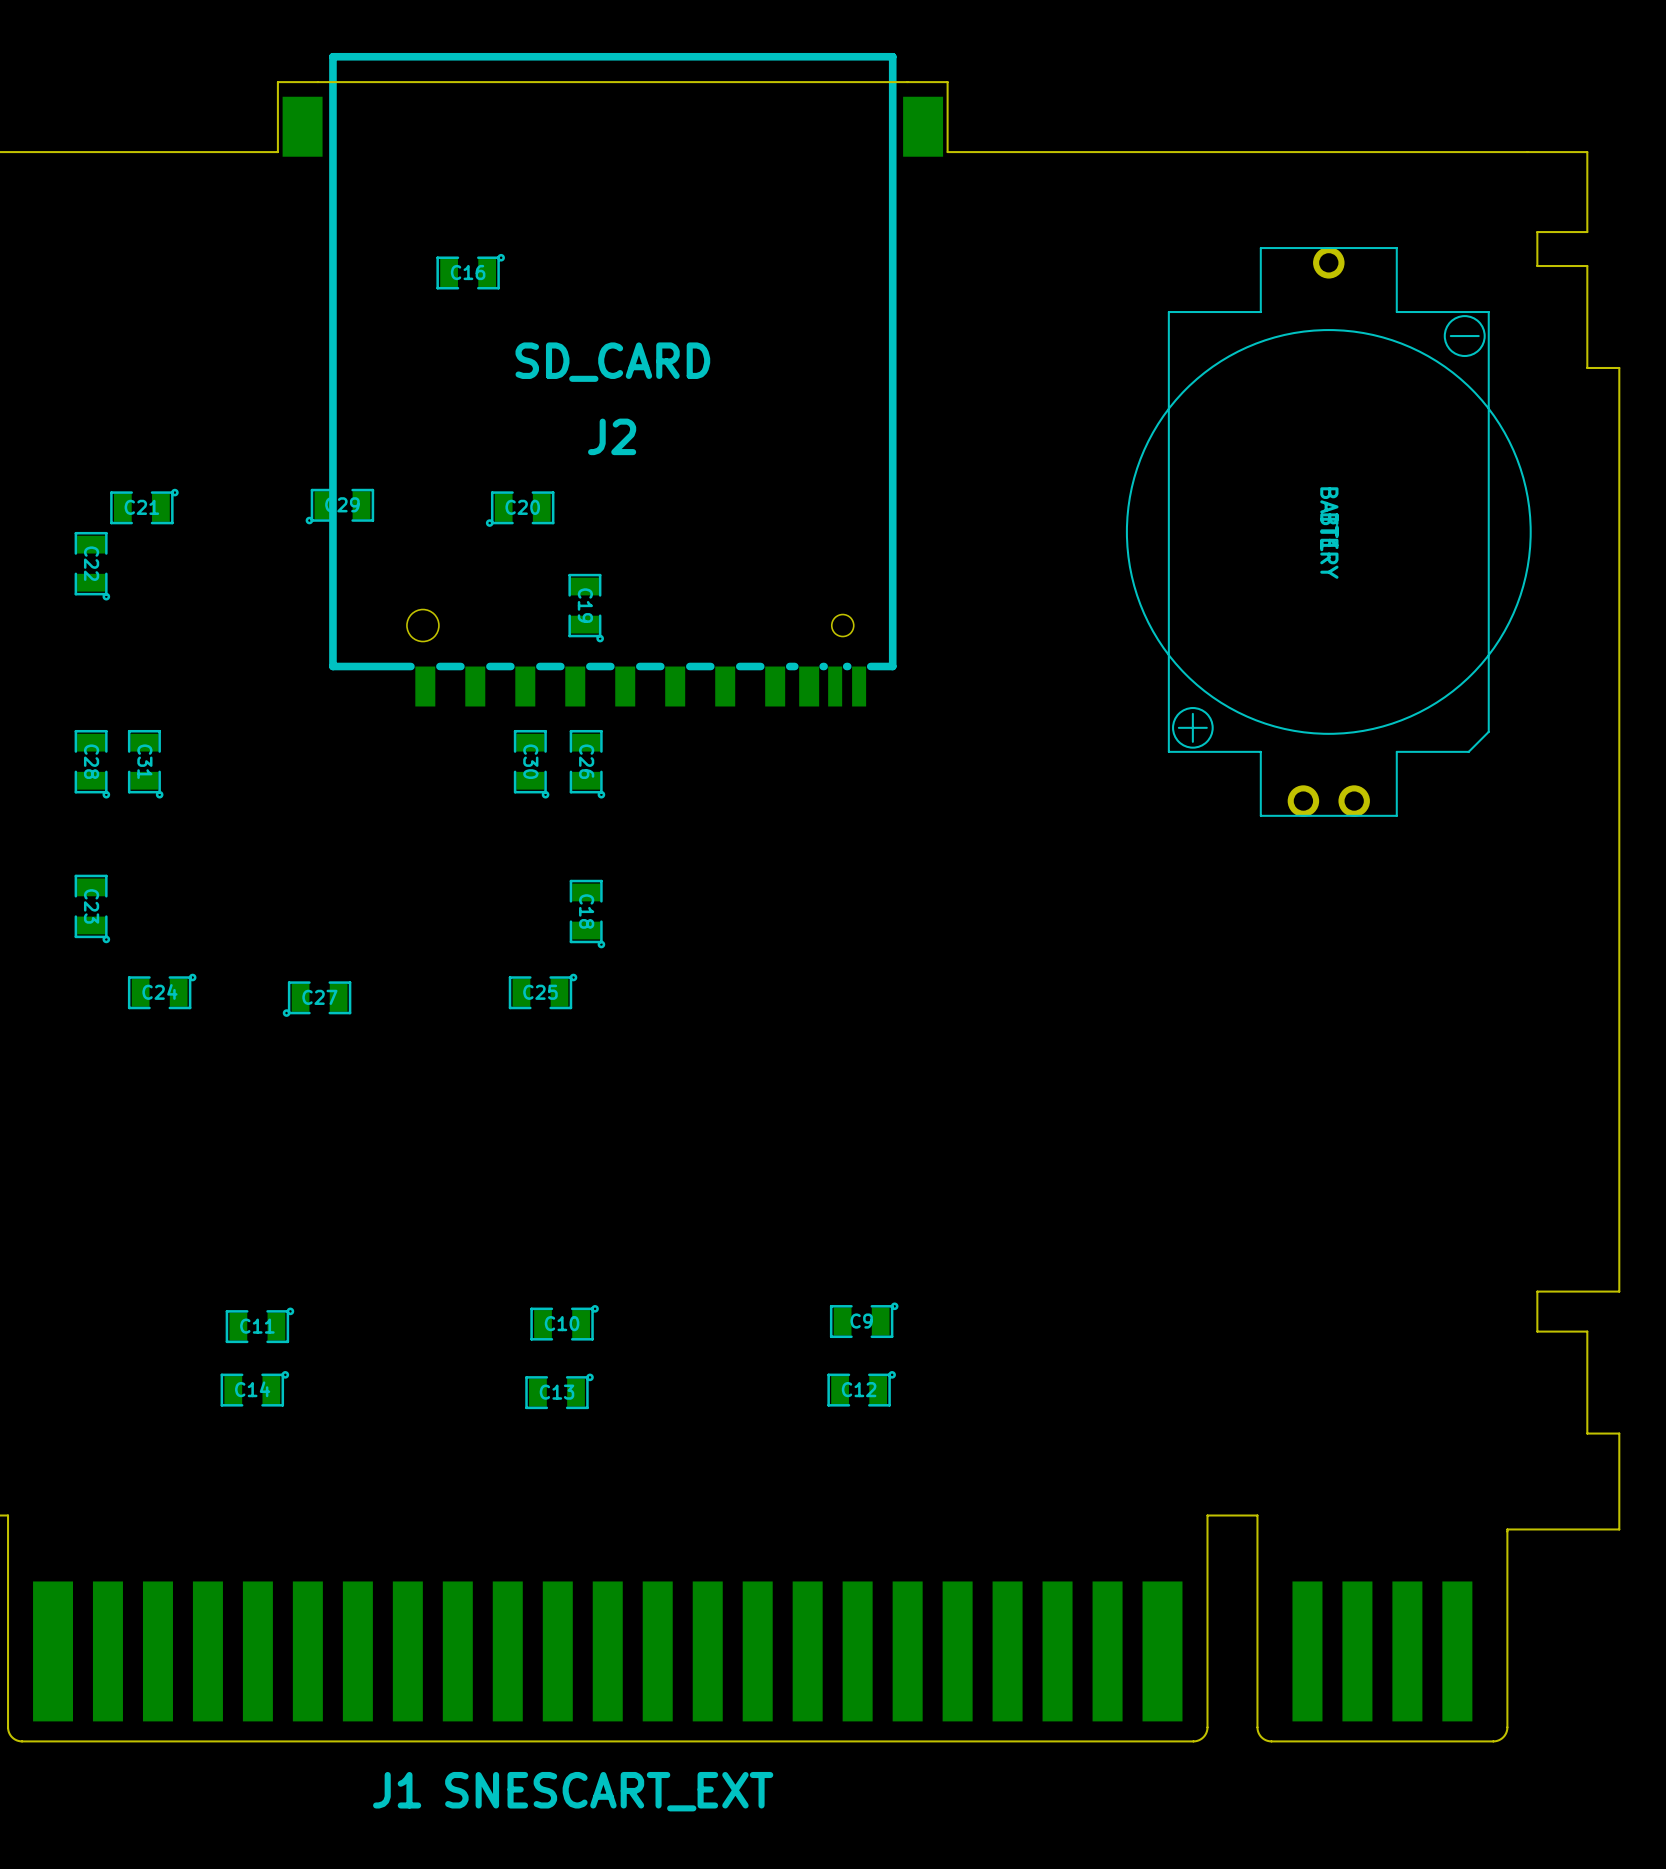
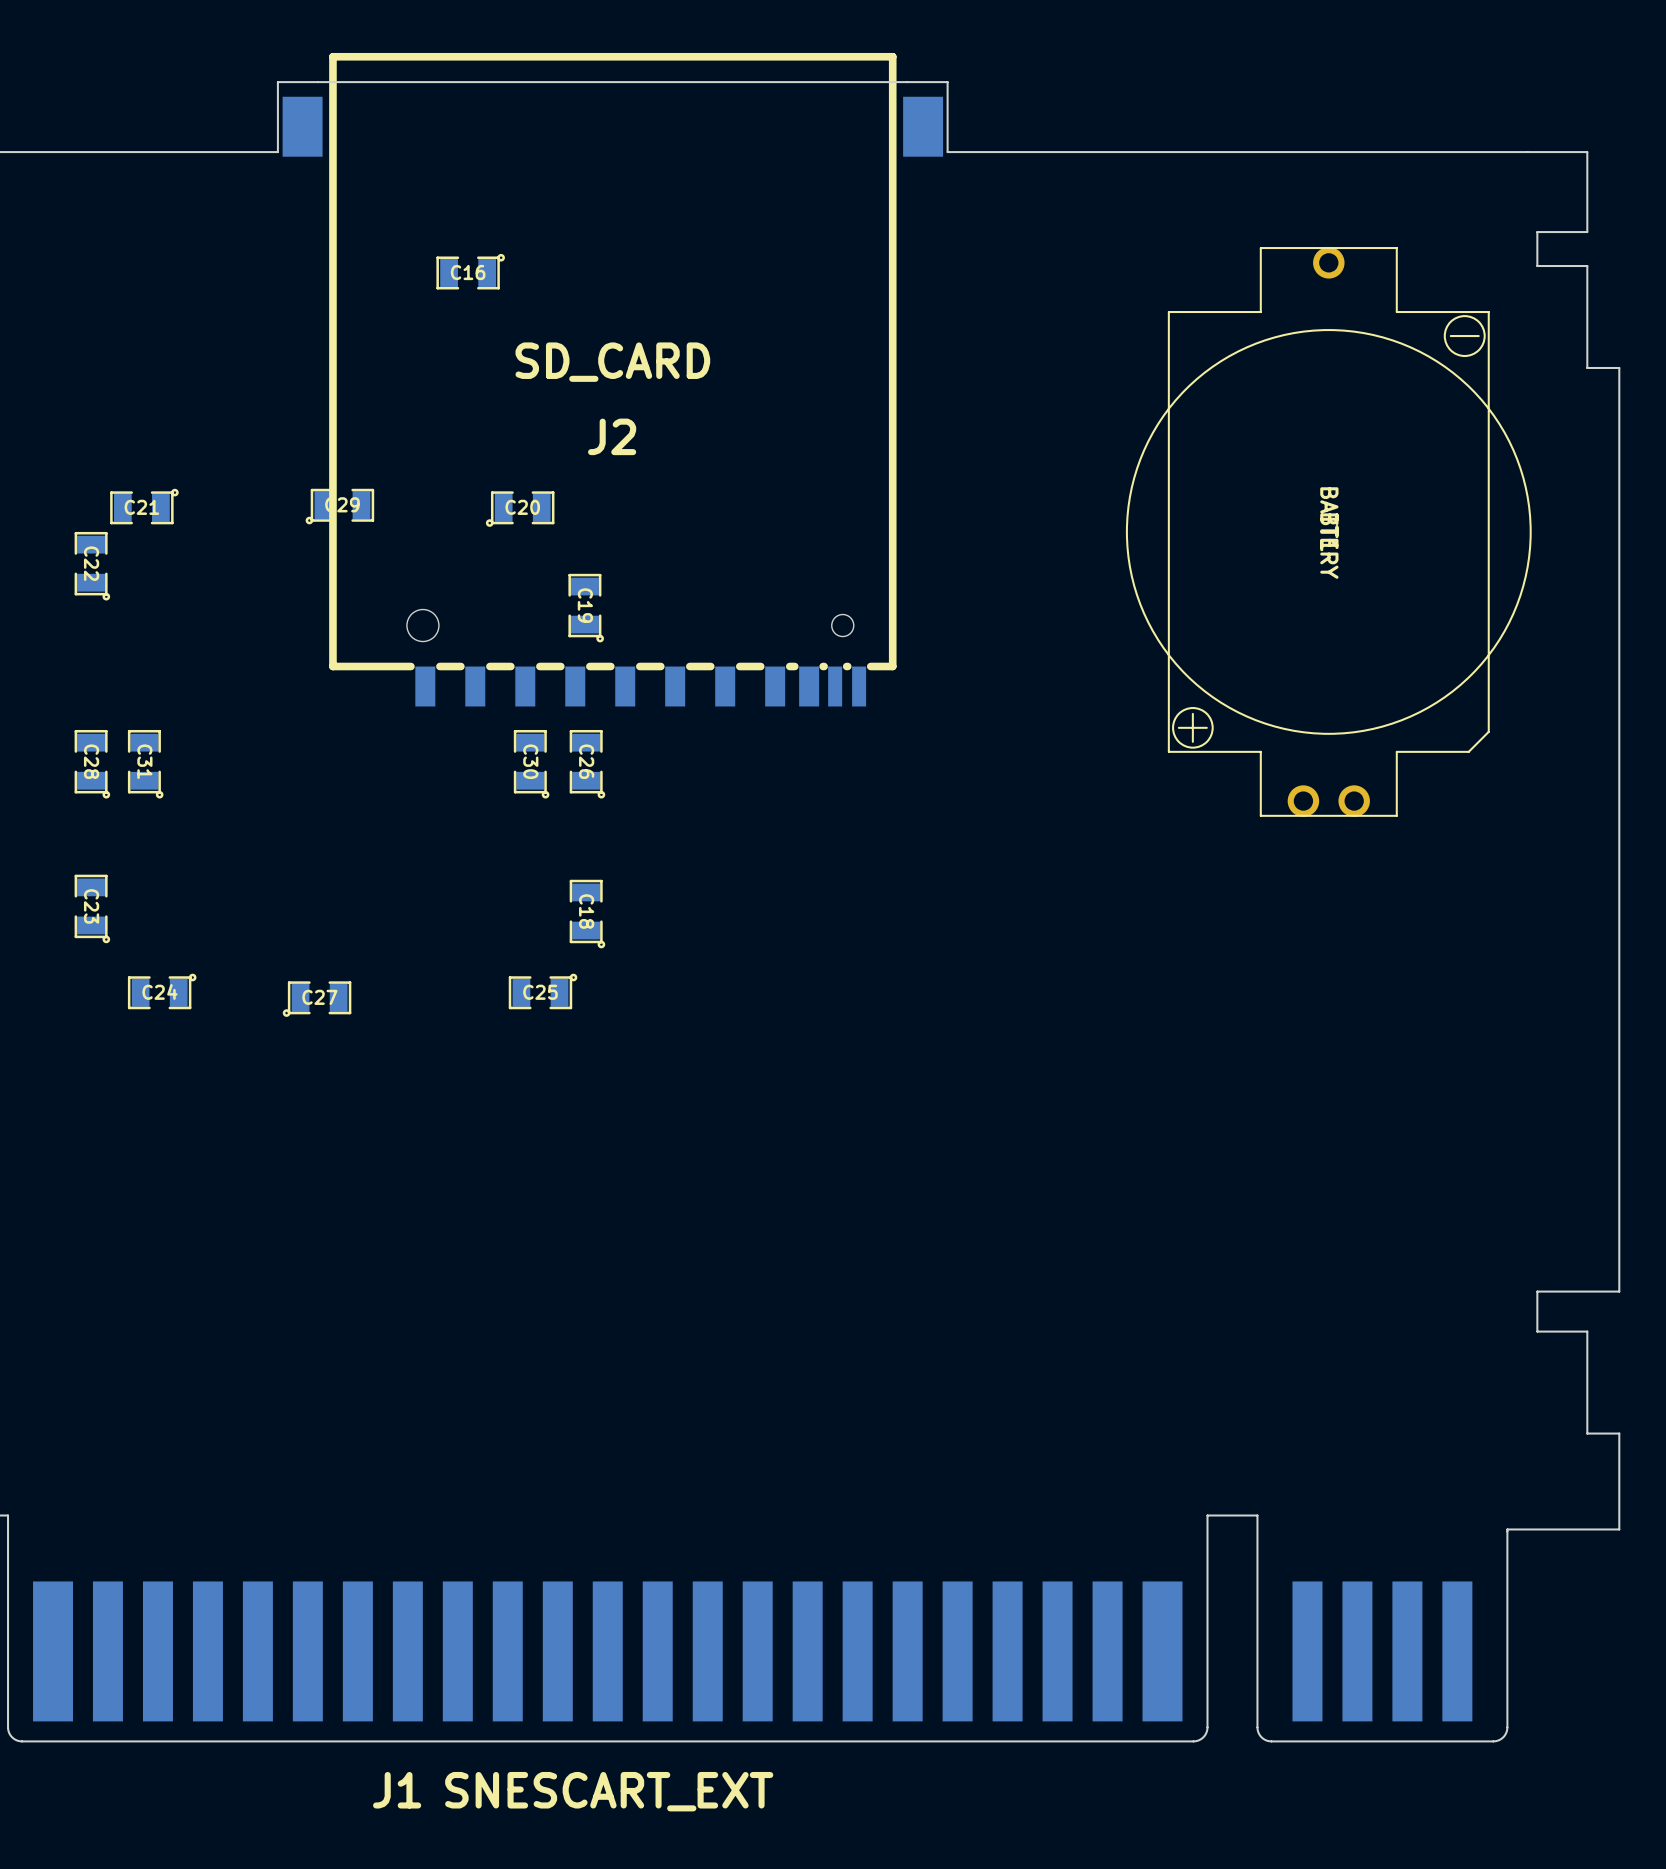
C9: (864, 1320) -> none
C10: (564, 1322) -> none
C11: (259, 1325) -> none
C14: (254, 1388) -> none
C12: (861, 1388) -> none
C13: (559, 1391) -> none

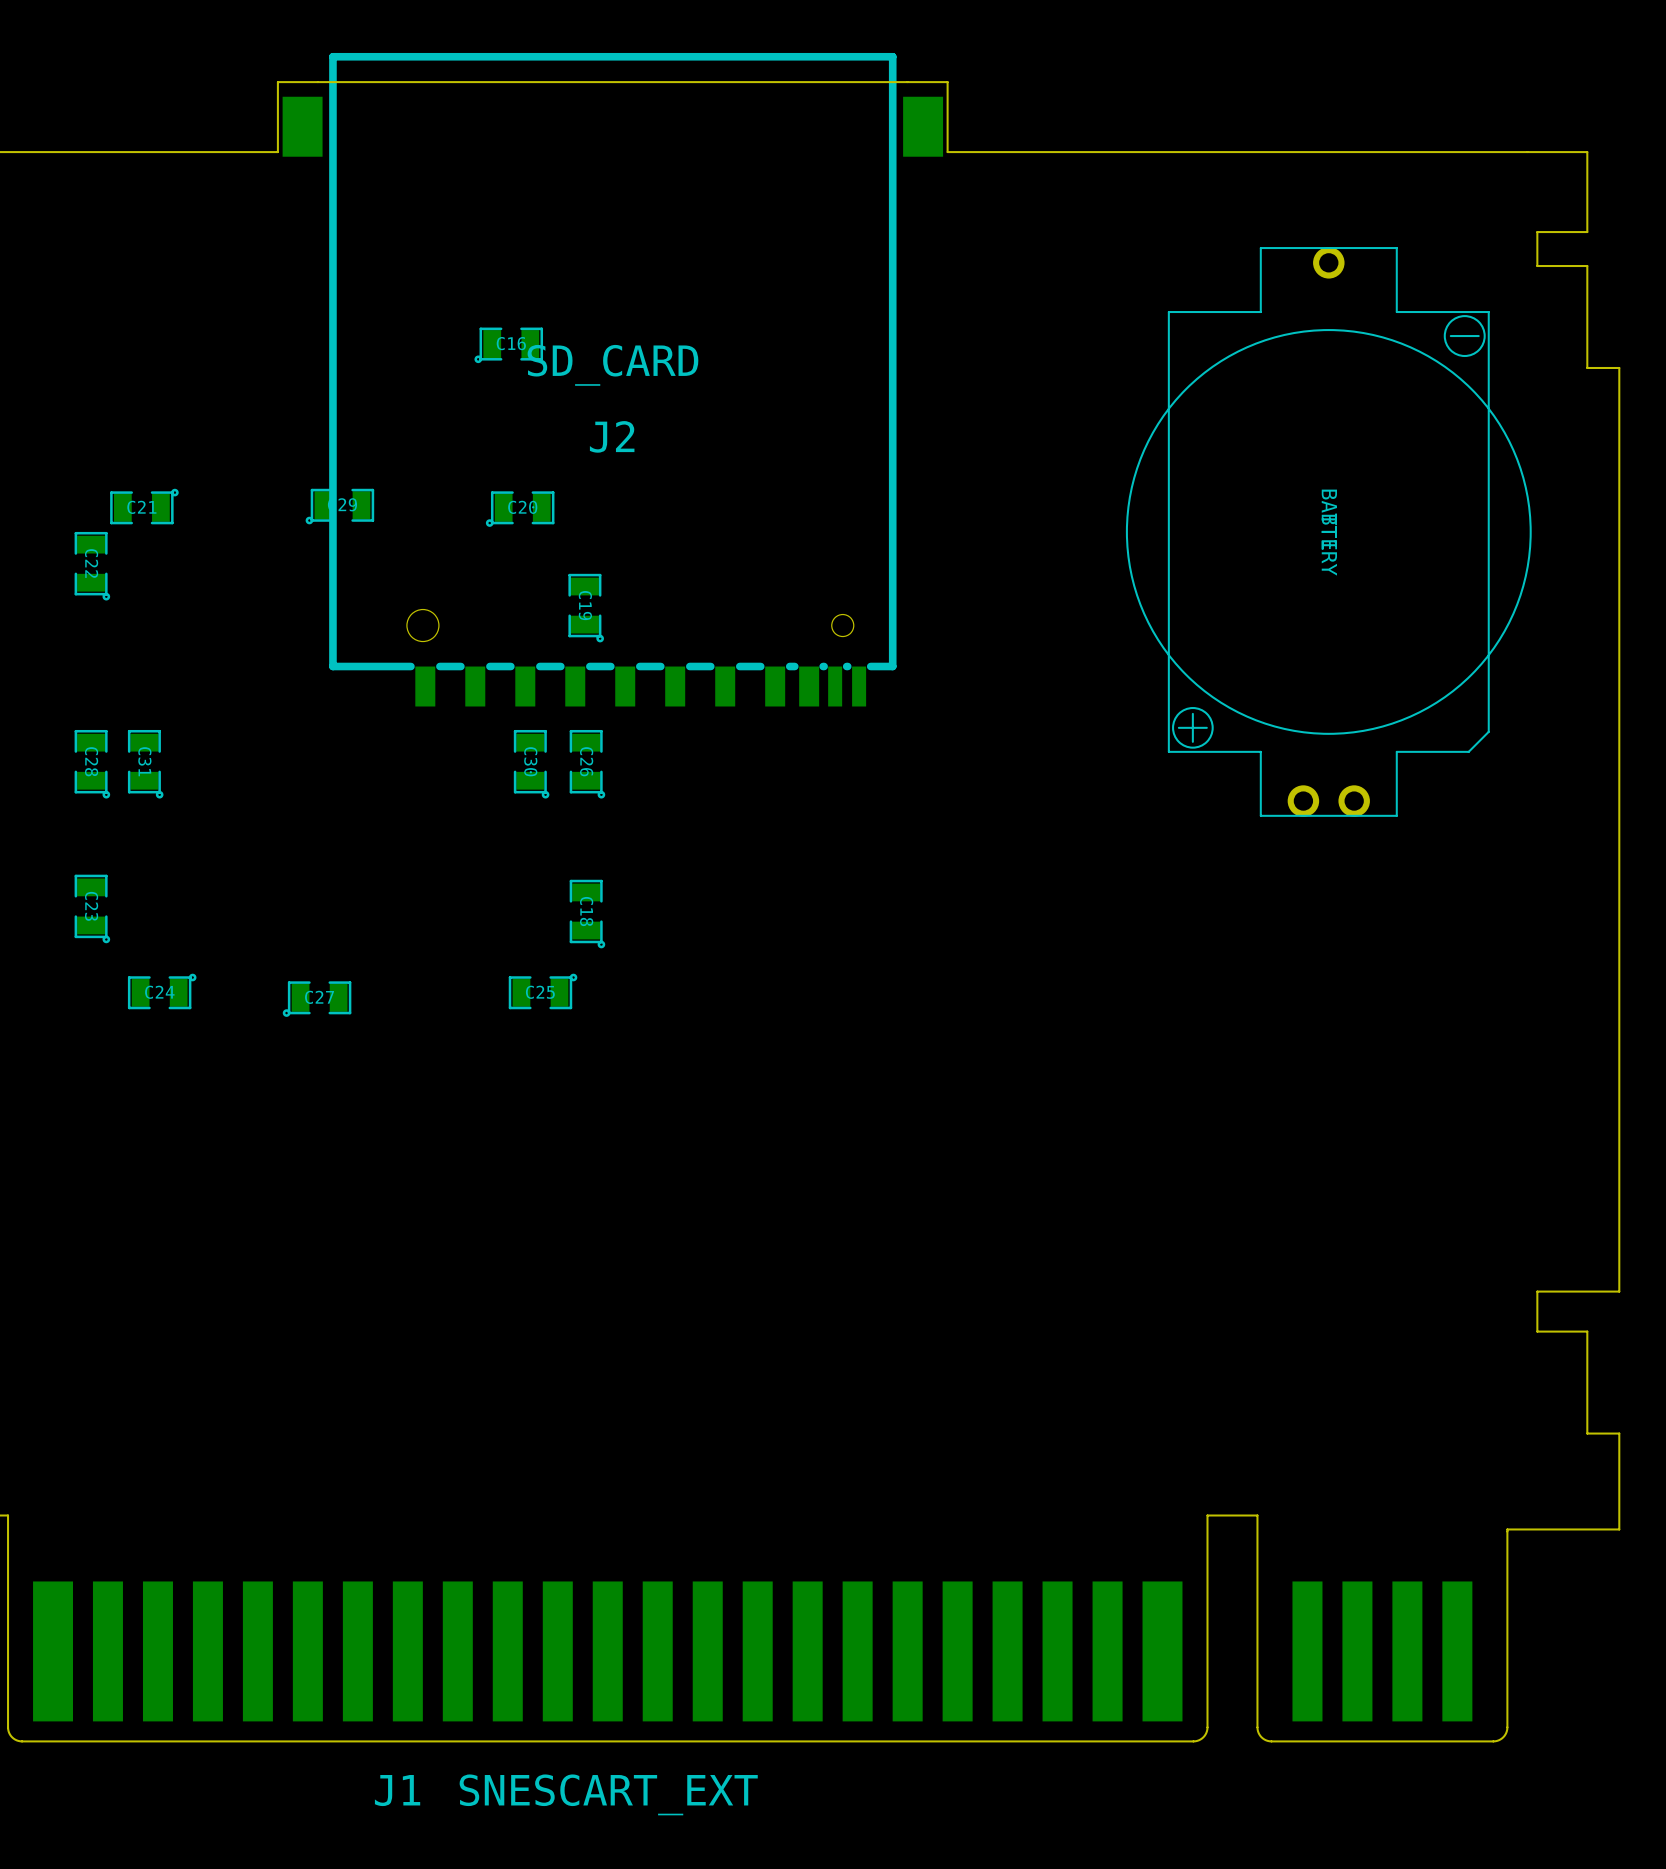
C16 rotation: 0° (470, 271) -> 180° (508, 345)
C16 position: (470, 271) -> (508, 345)

